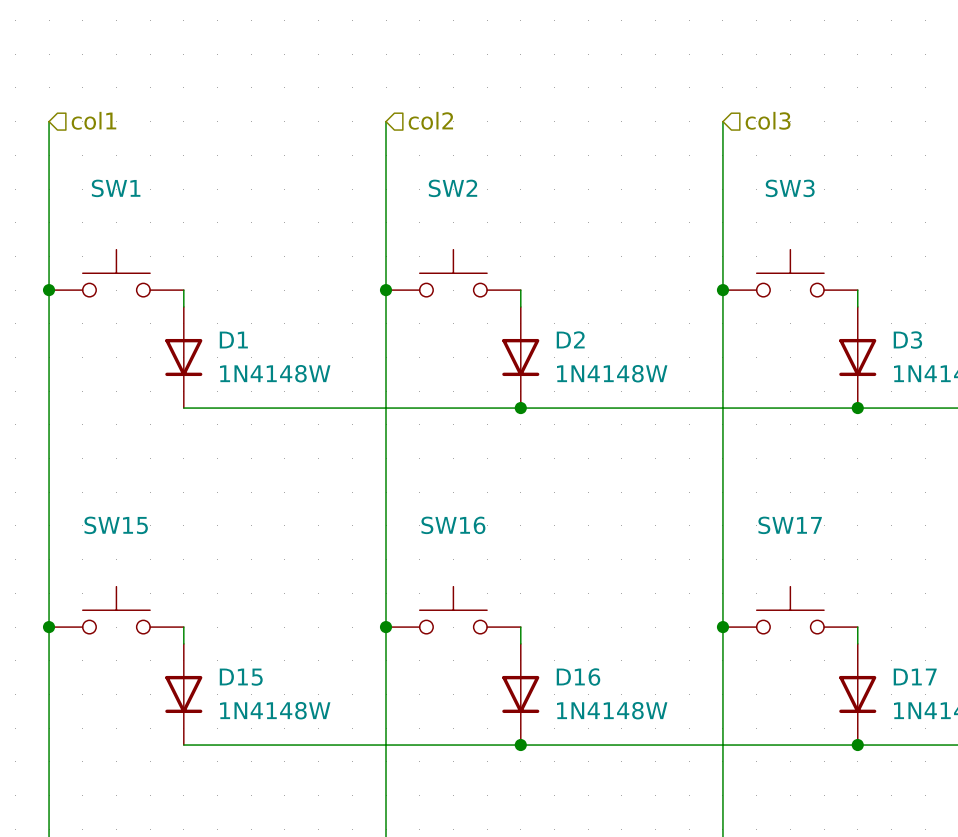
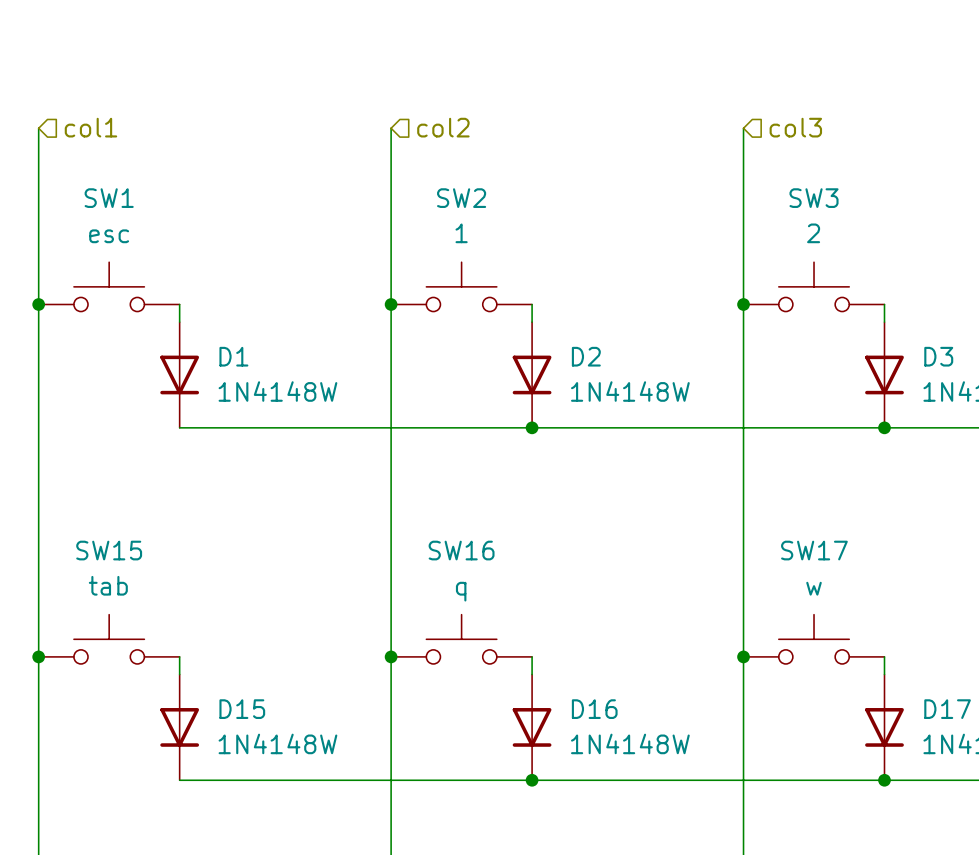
SW3 value: none -> 2 (813, 233)
SW2 value: none -> 1 (461, 233)
SW1 value: none -> esc (109, 236)
SW15 value: none -> tab (108, 585)
SW17 value: none -> w (814, 588)
SW16 value: none -> q (461, 591)

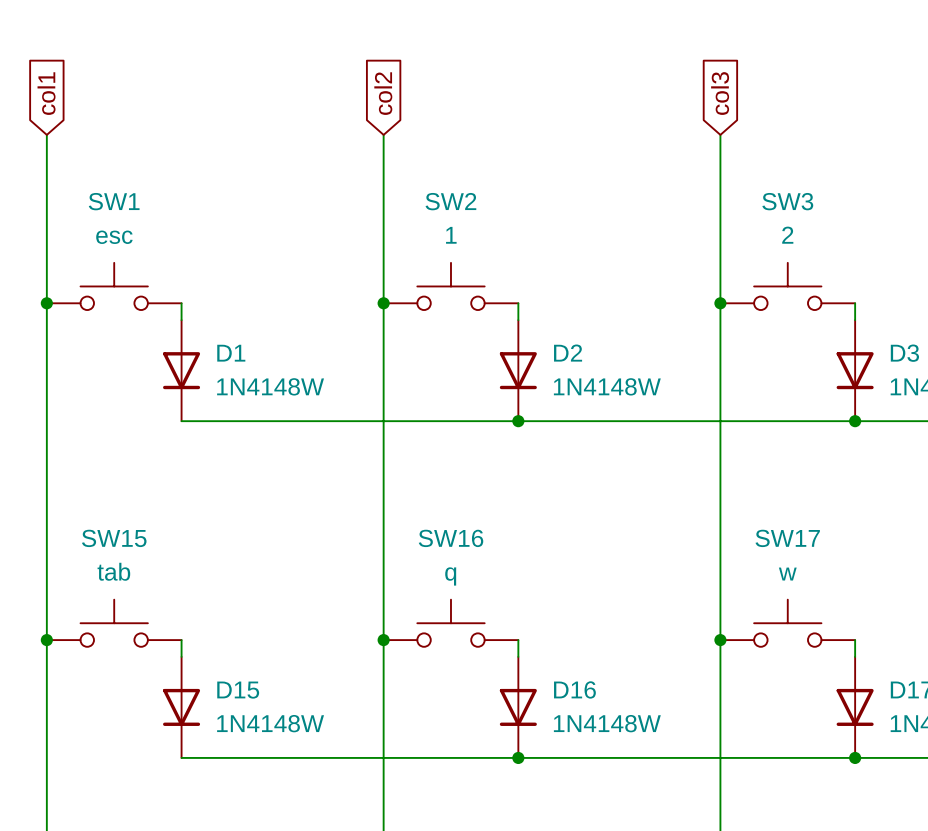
global label: none -> col1 (46, 93)
global label: none -> col2 (383, 93)
global label: none -> col3 (720, 93)
hierarchical label: col1 (90, 127) -> none
hierarchical label: col2 (443, 127) -> none
hierarchical label: col3 (795, 127) -> none

